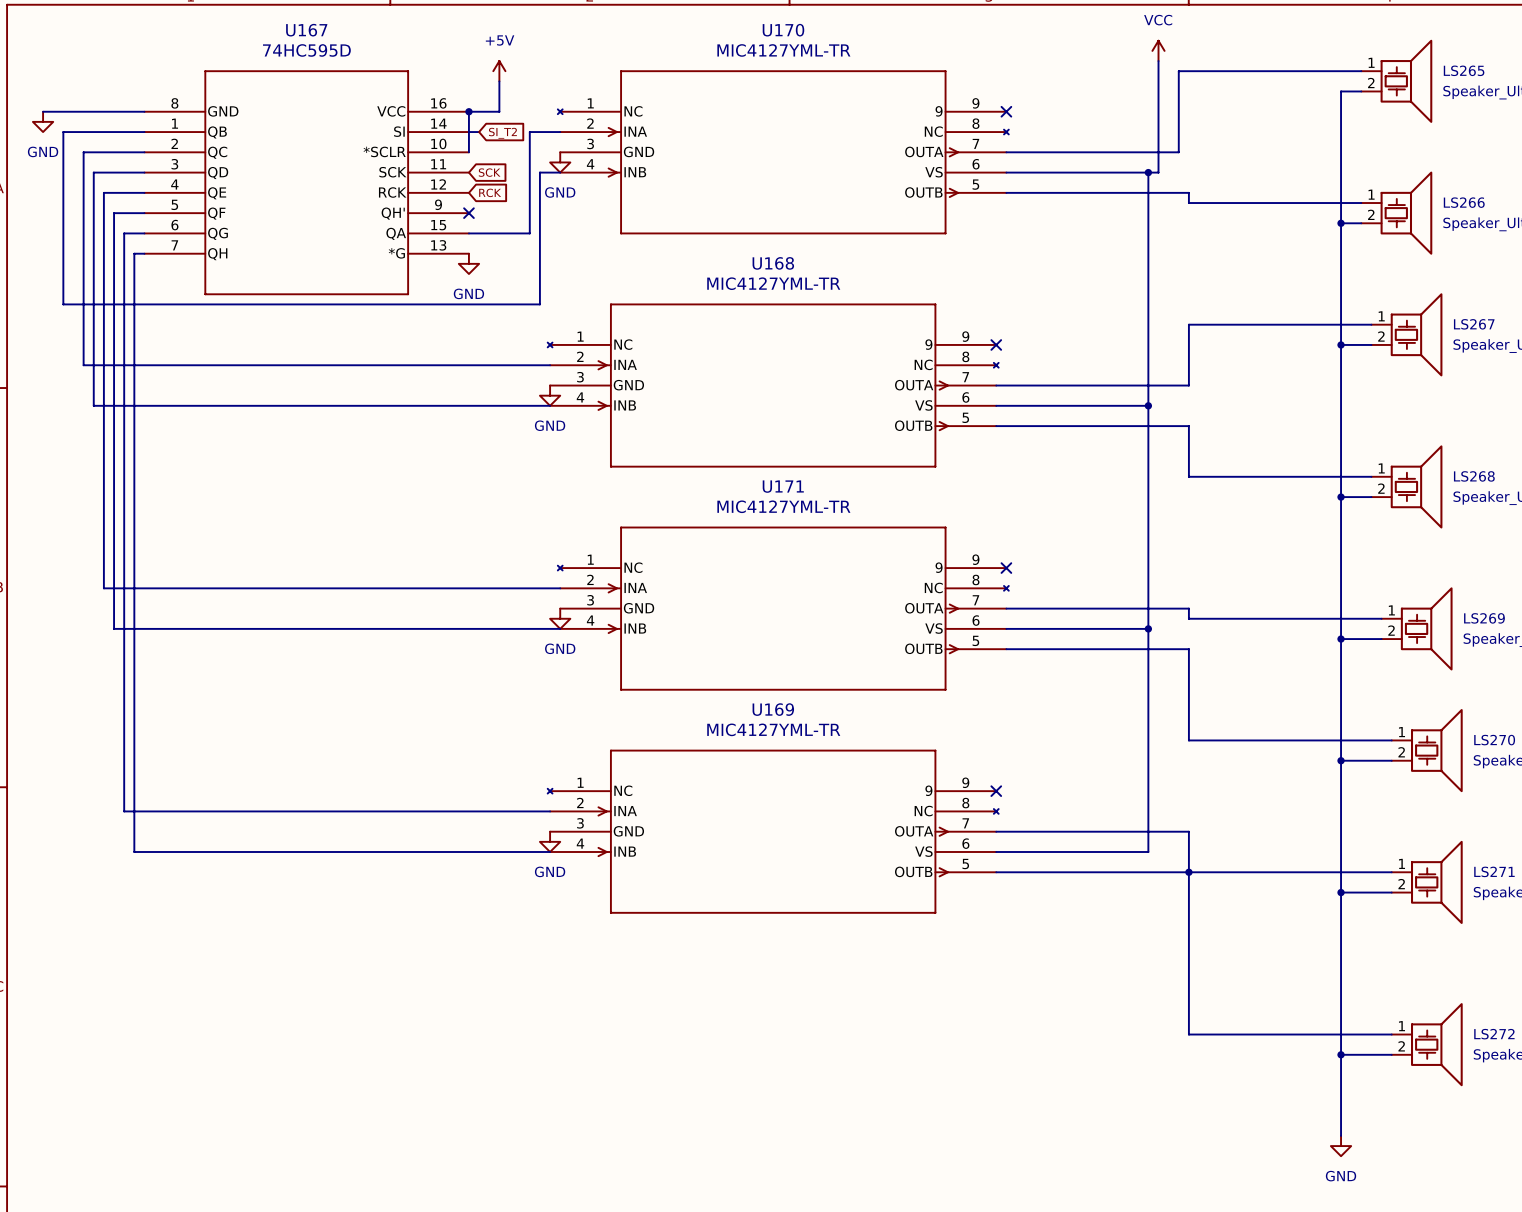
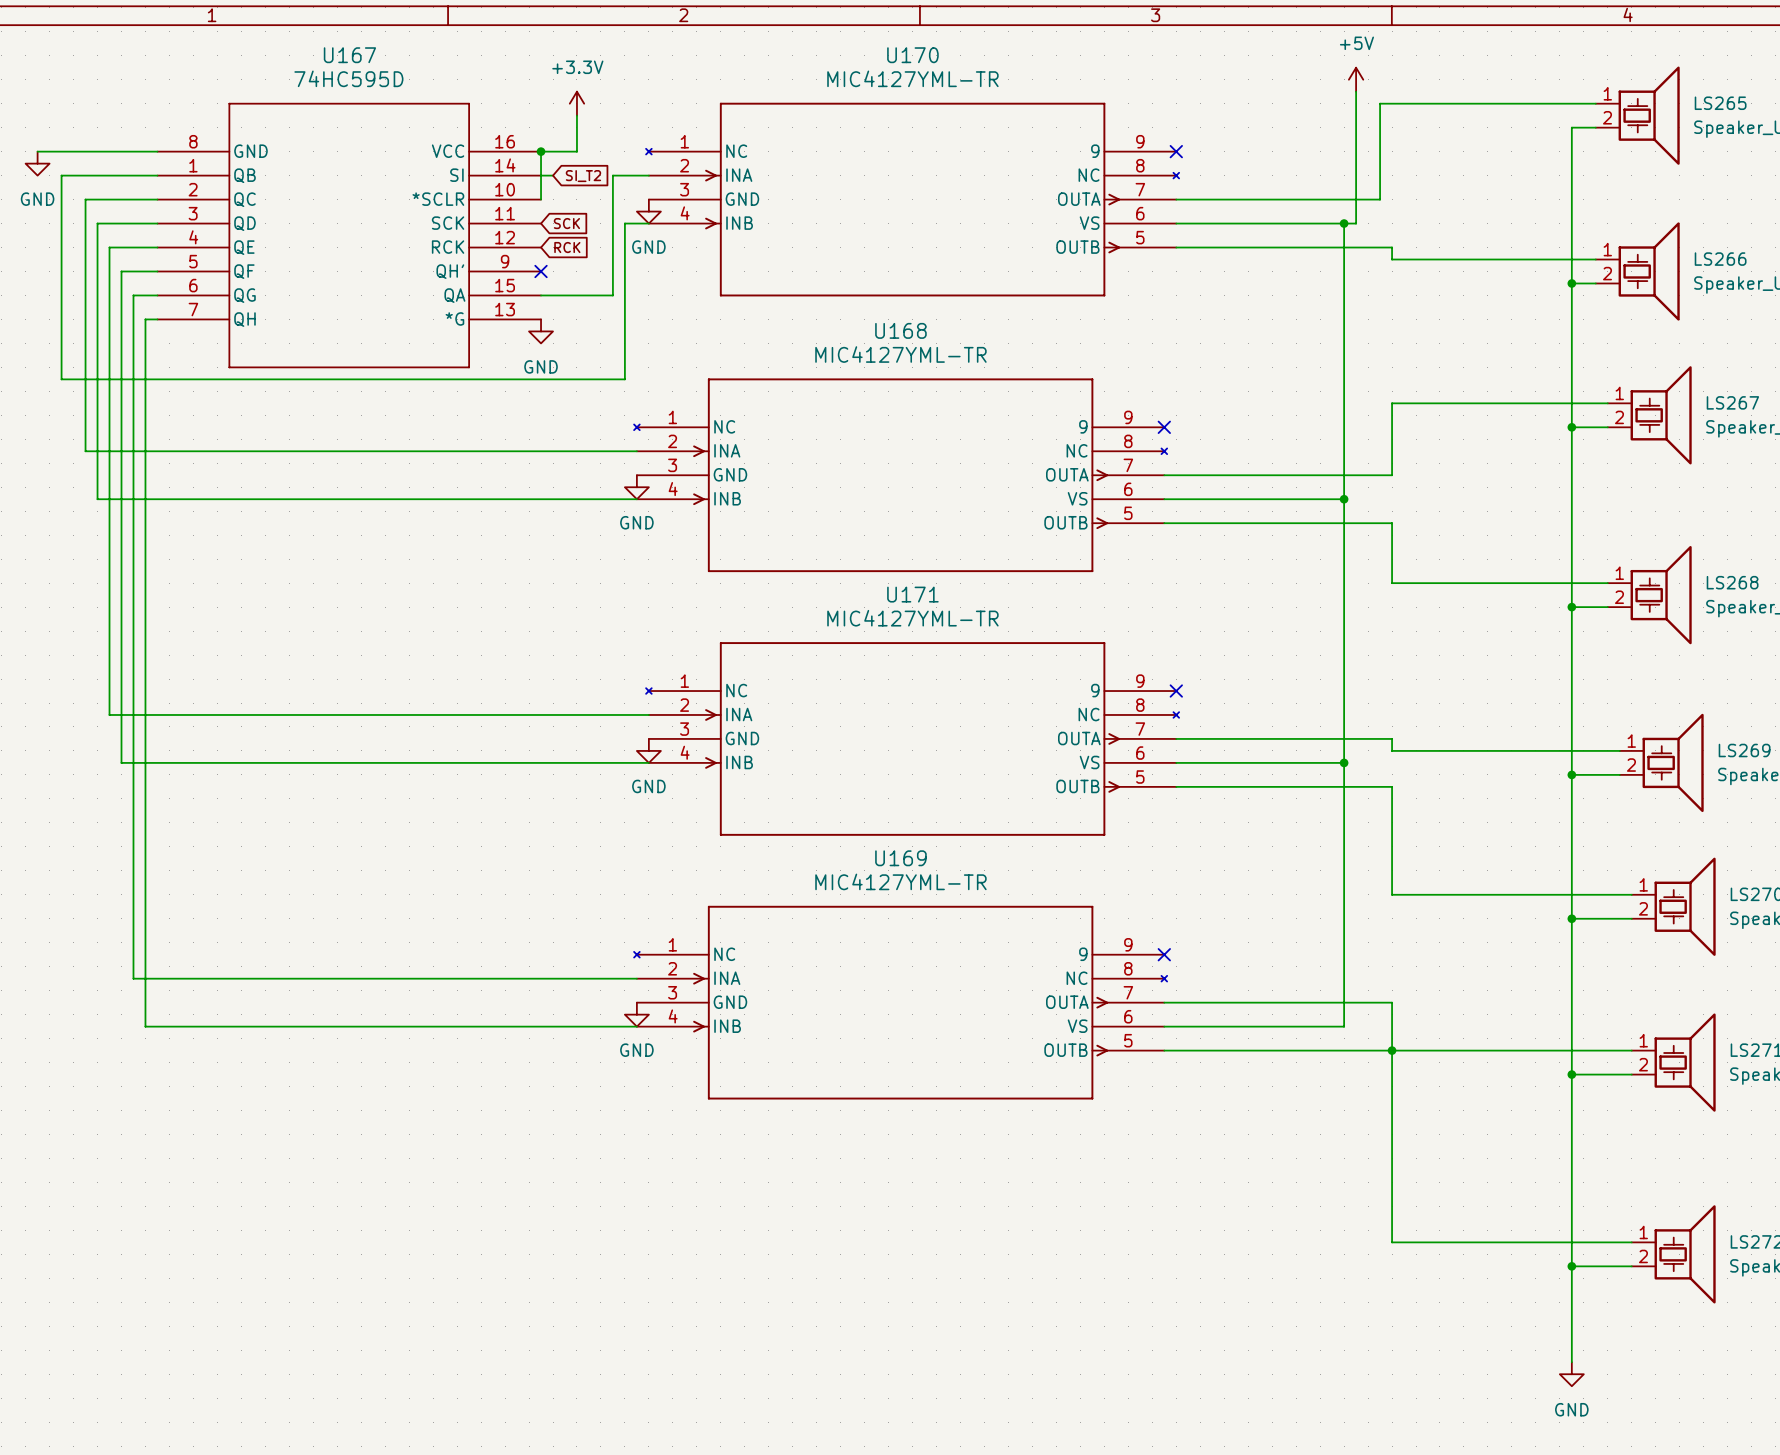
power symbol: VCC (1158, 50) -> +5V (1356, 79)
power symbol: +5V (499, 71) -> +3.3V (576, 103)

